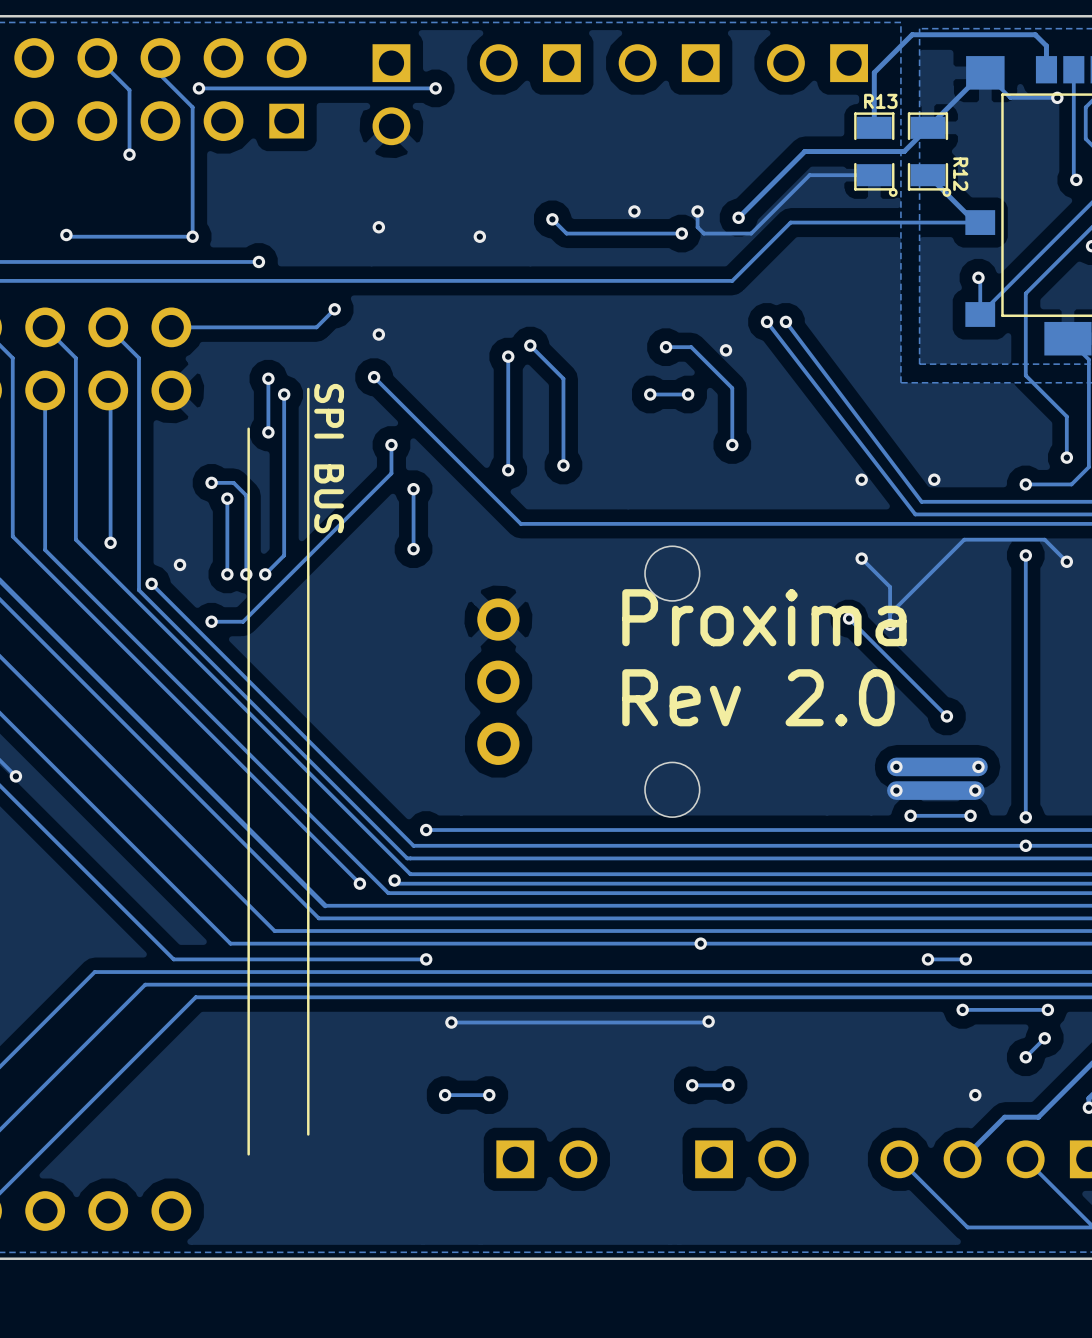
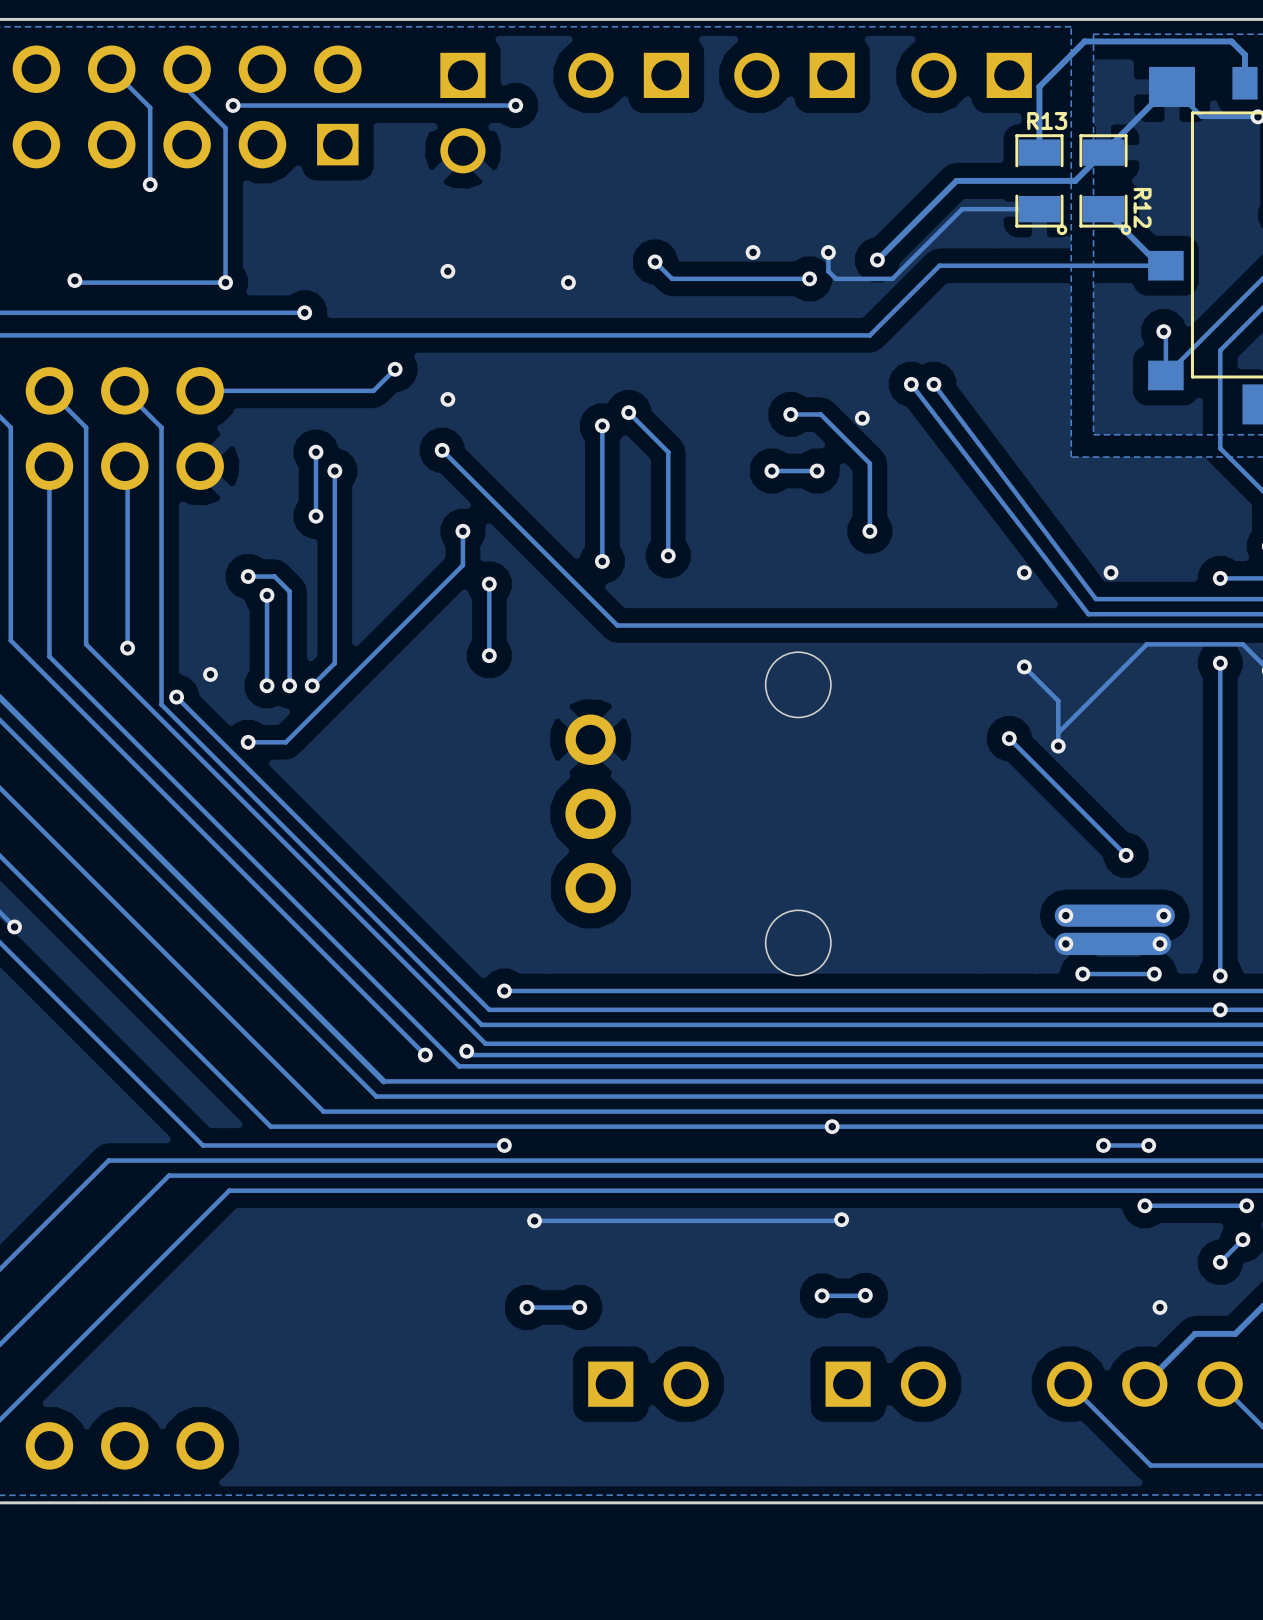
line: (308, 388) (308, 1134) -> none
line: (248, 428) (248, 1154) -> none
text: SPI BUS (329, 458) -> none
text: Proxima (764, 617) -> none
text: Rev 2.0 (758, 697) -> none

